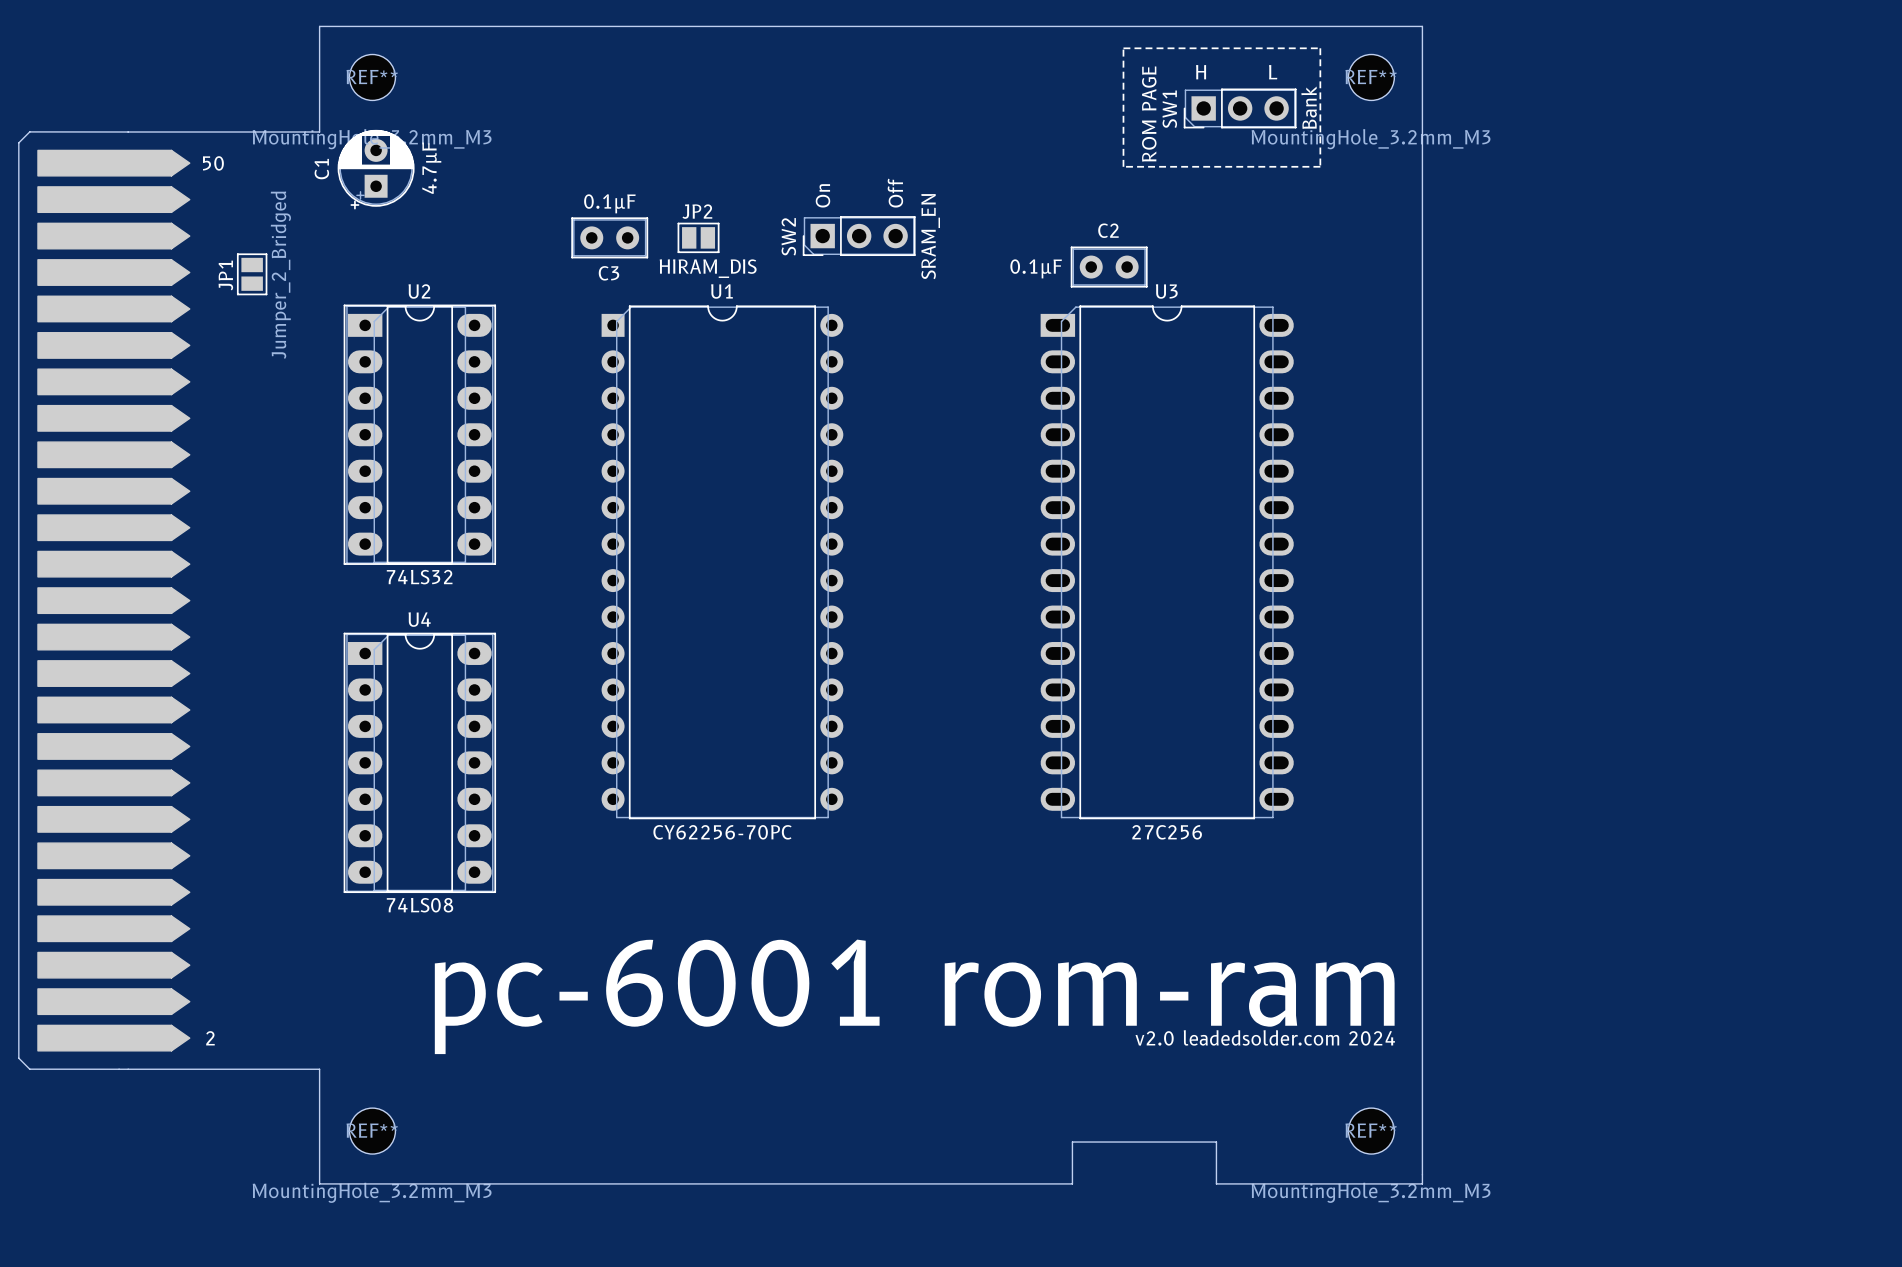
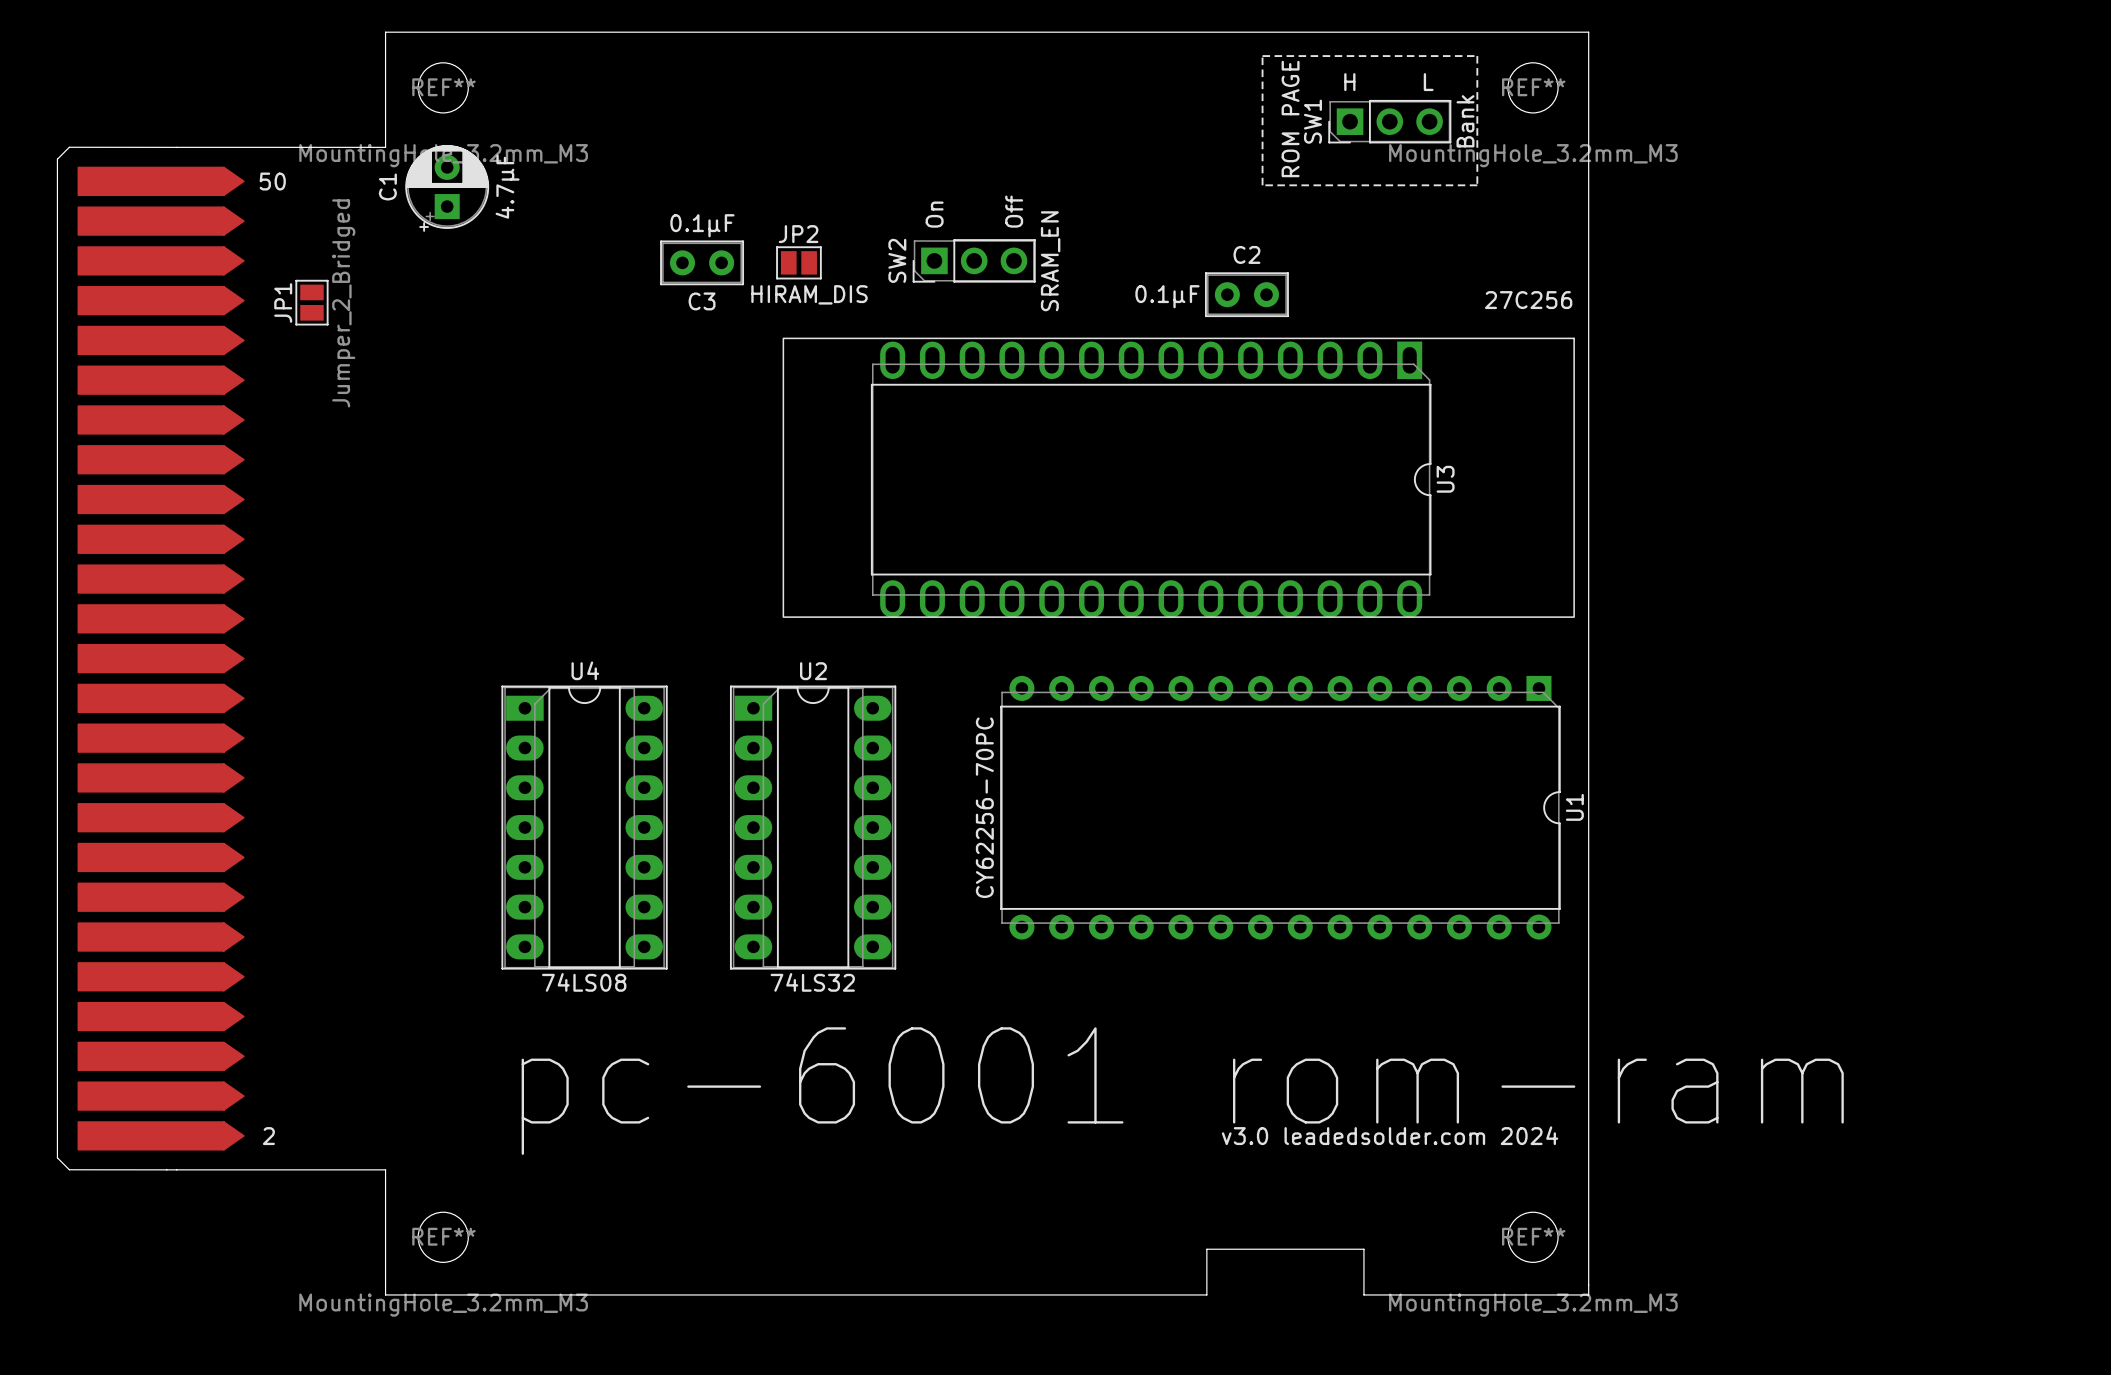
U3 name position: U3 (1166, 291) -> U3 (1445, 479)
U3 footprint: [1040, 305, 1294, 820] -> [782, 337, 1575, 618]
U2 position: (419, 434) -> (813, 827)
U1 rotation: 0° (722, 562) -> 90° clockwise (1280, 807)
U1 position: (722, 562) -> (1280, 807)
U4 position: (419, 762) -> (584, 827)
U3 value position: 27C256 (1167, 832) -> 27C256 (1528, 300)
text: v2.0 leadedsolder.com 2024 (1265, 1037) -> v3.0 leadedsolder.com 2024 (1390, 1135)

